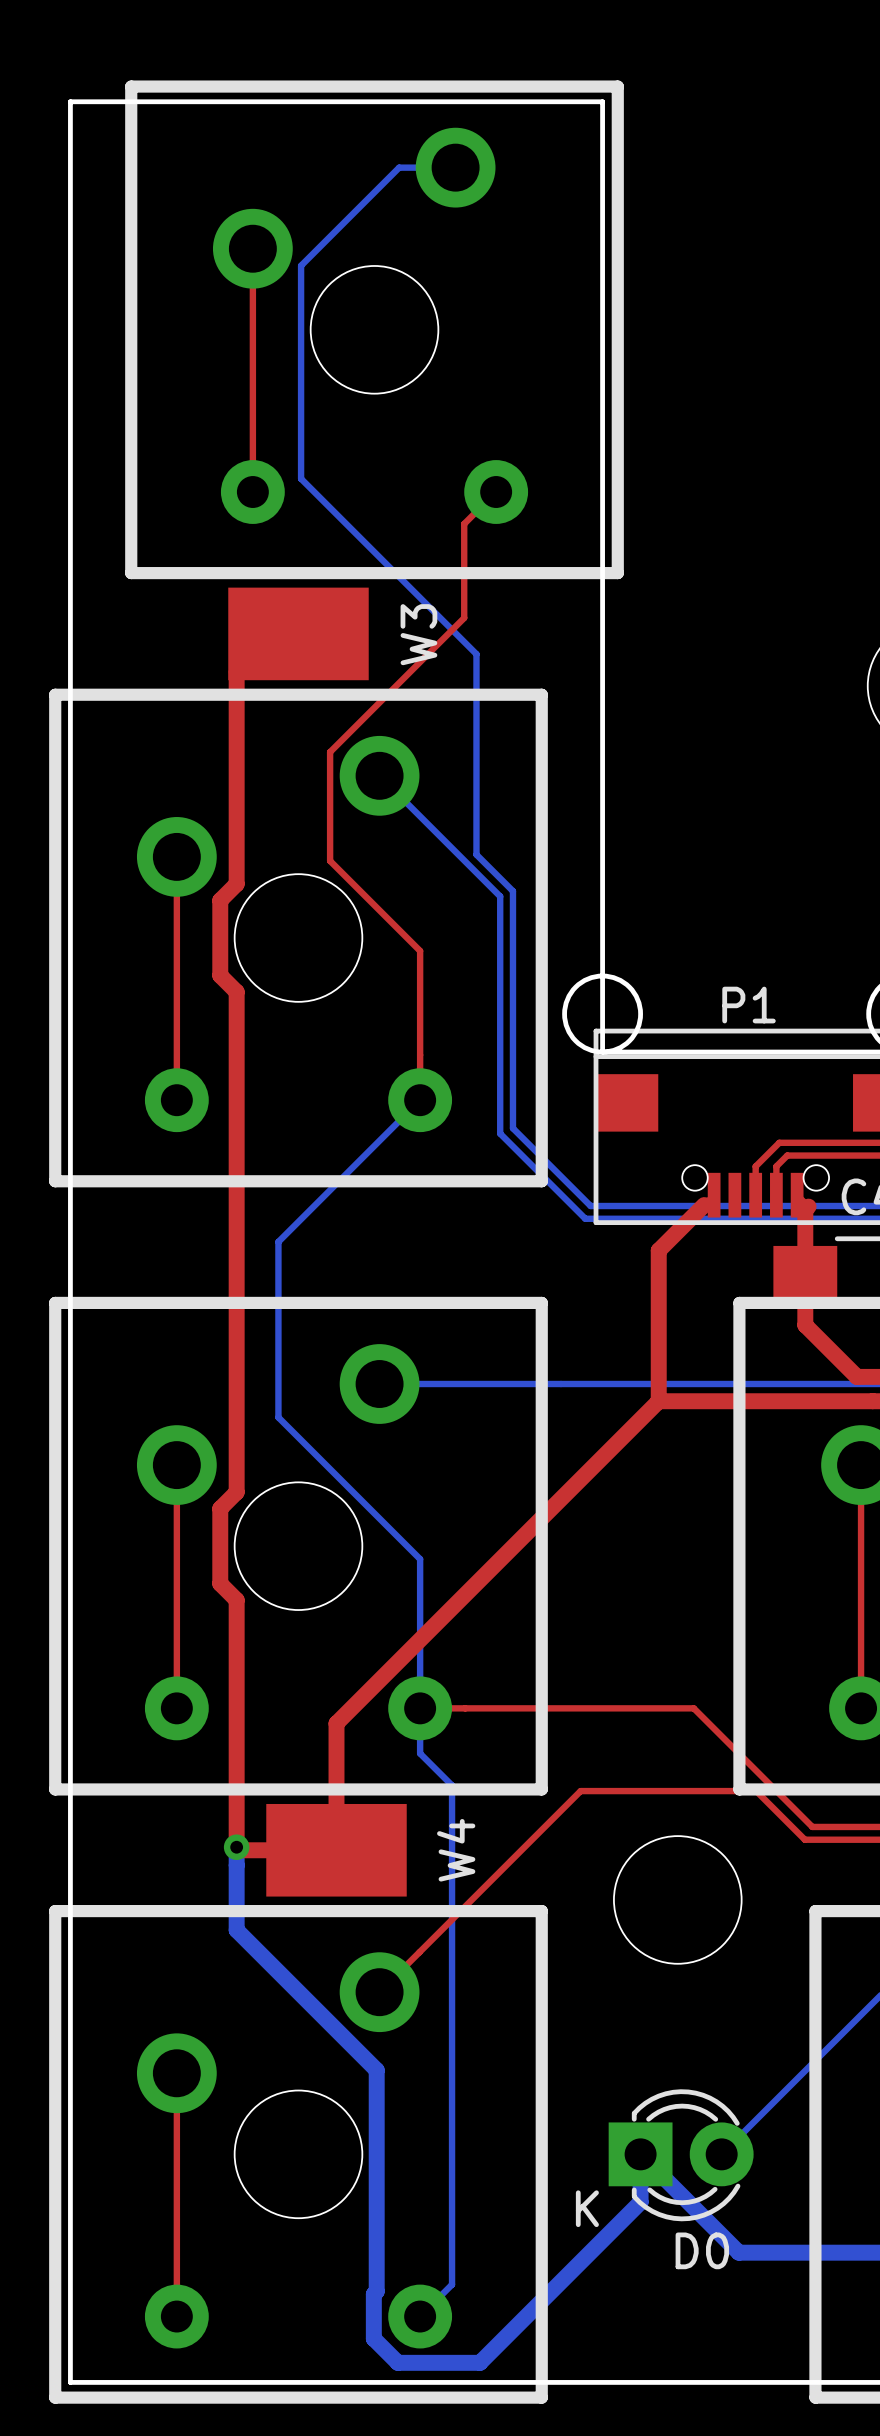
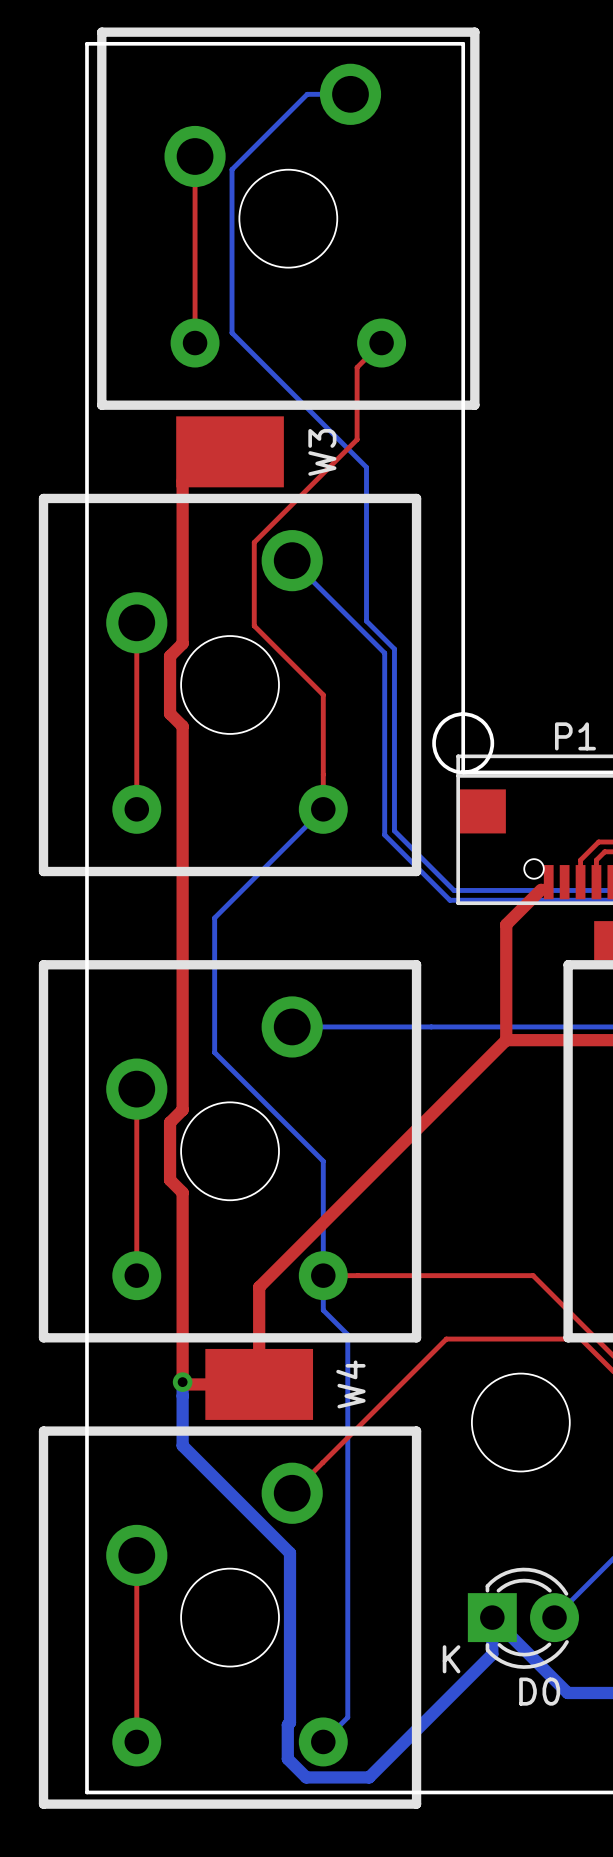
board edge: (111, 101) (70, 101) (70, 2382) (111, 2382) -> (86, 43) (86, 1792)

